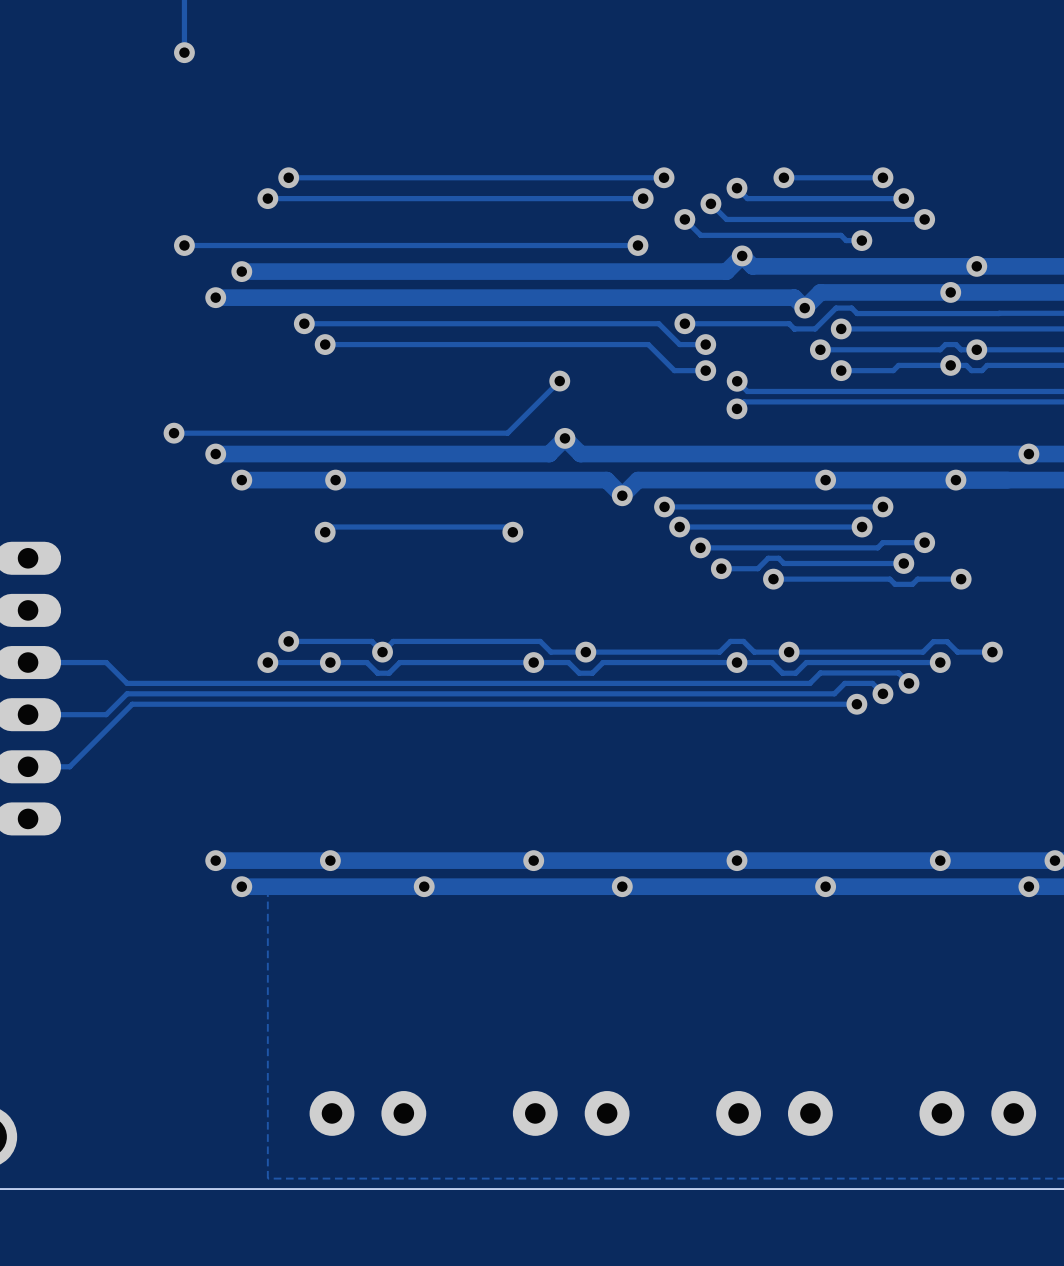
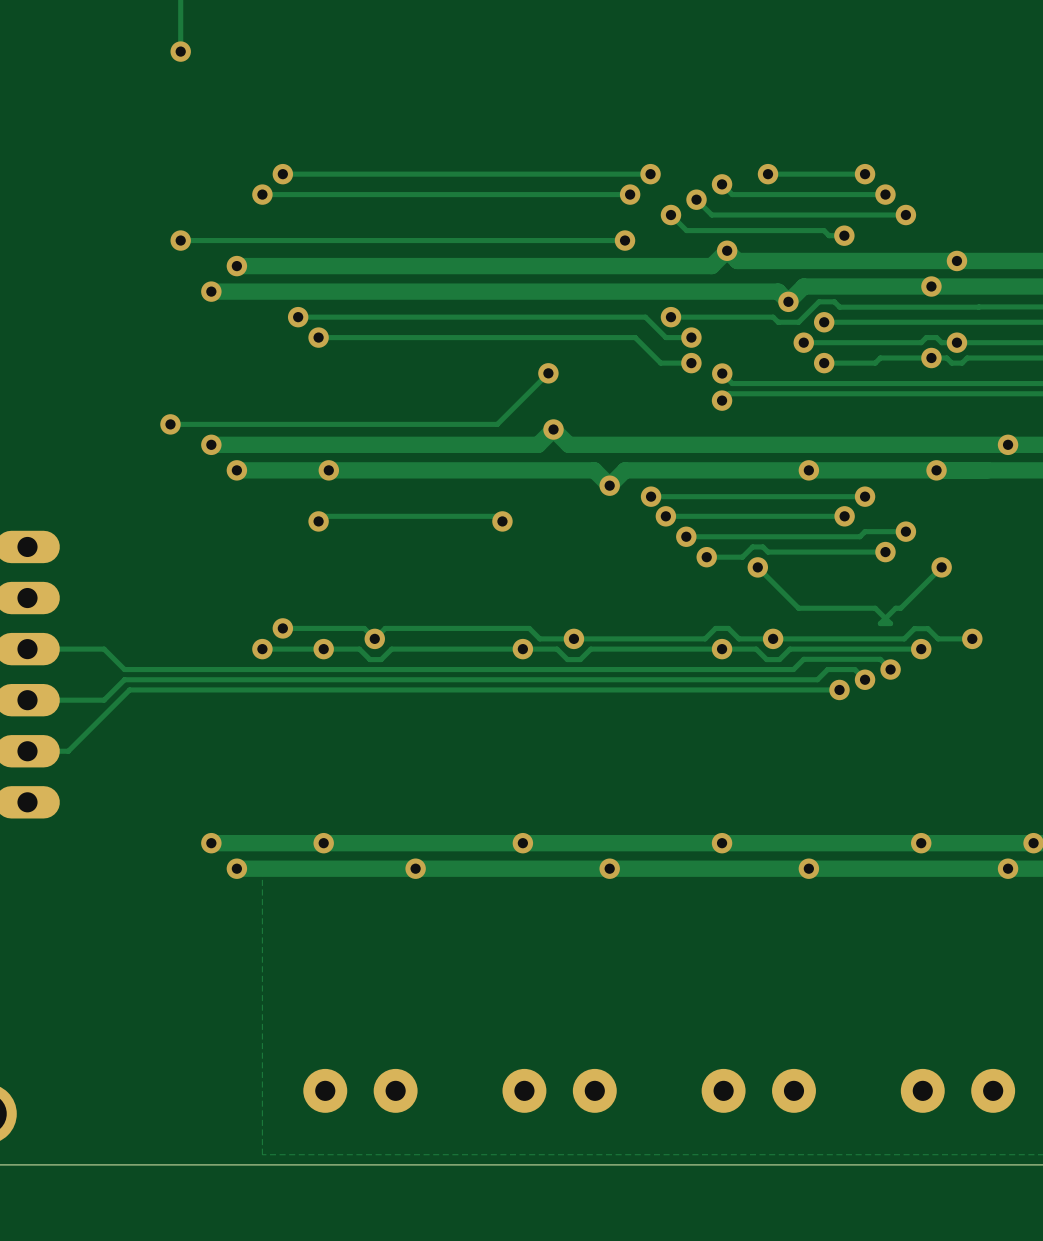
track: (961, 579) (917, 579) (912, 584) (895, 584) (889, 579) (773, 579) -> (941, 567) (900, 608) (895, 608) (880, 623) (890, 623) (875, 608) (798, 608) (757, 567)

